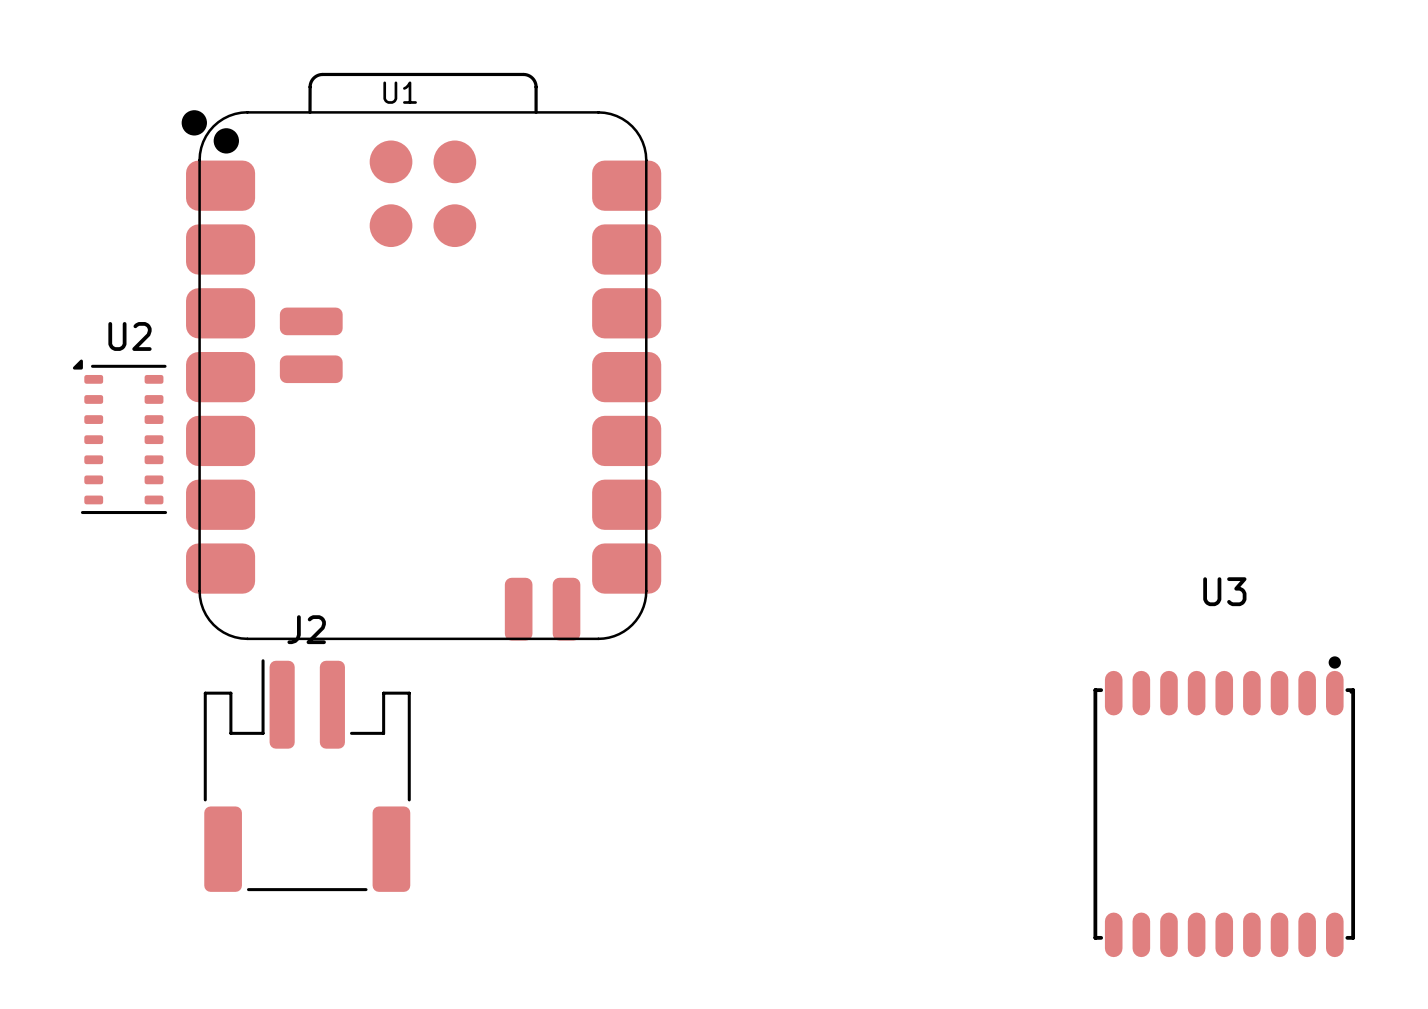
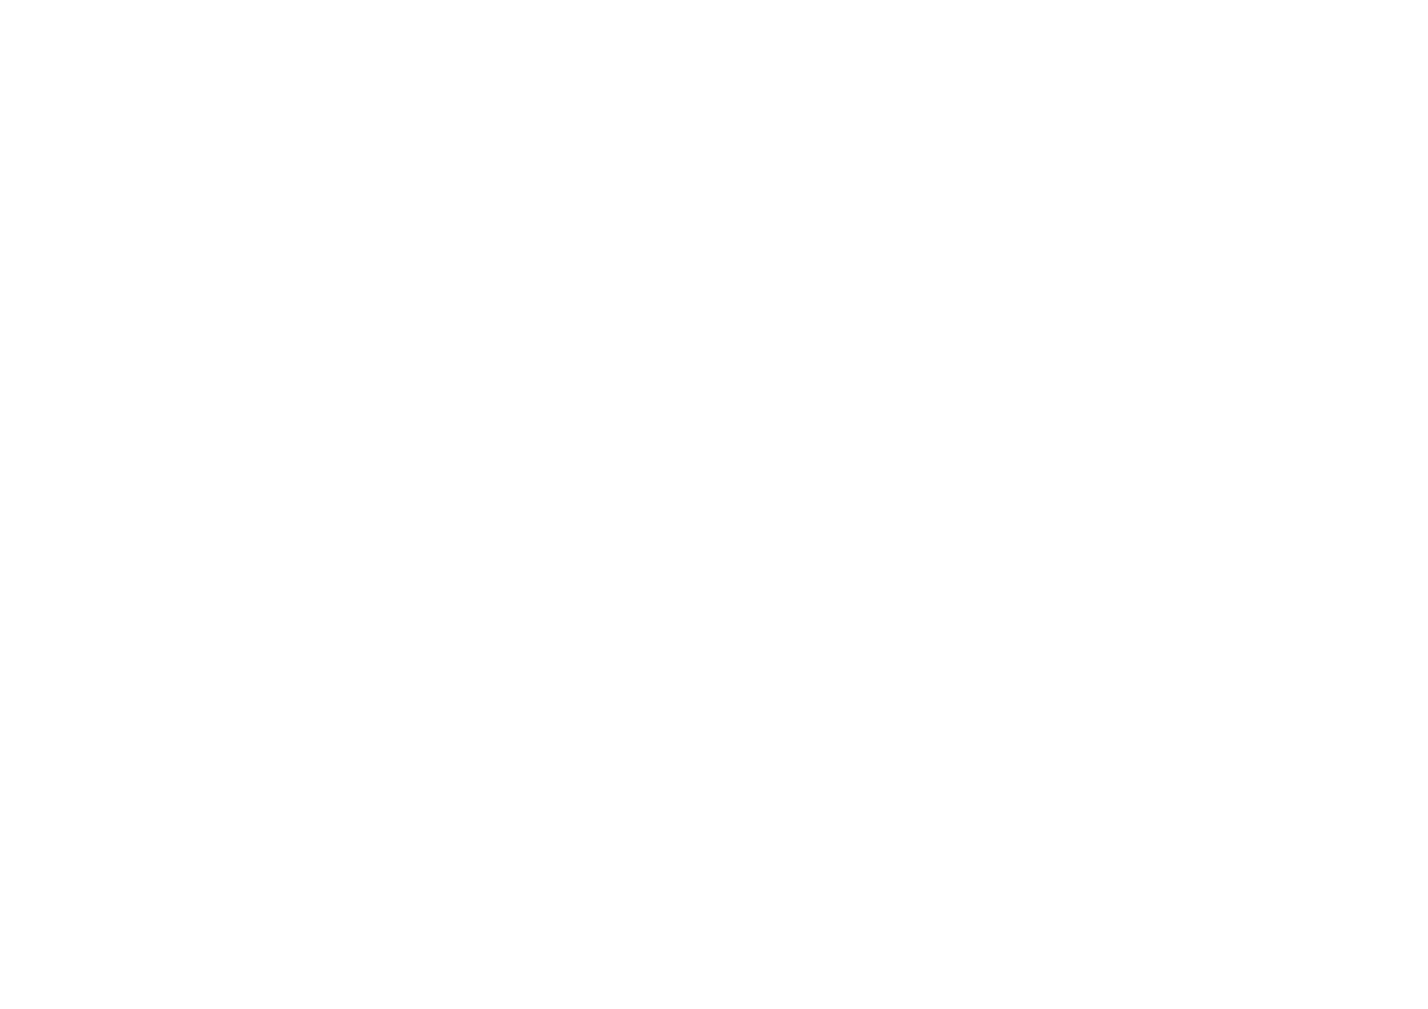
U1: (421, 356) -> none
U2: (119, 436) -> none
J2: (307, 775) -> none
U3: (1224, 806) -> none

